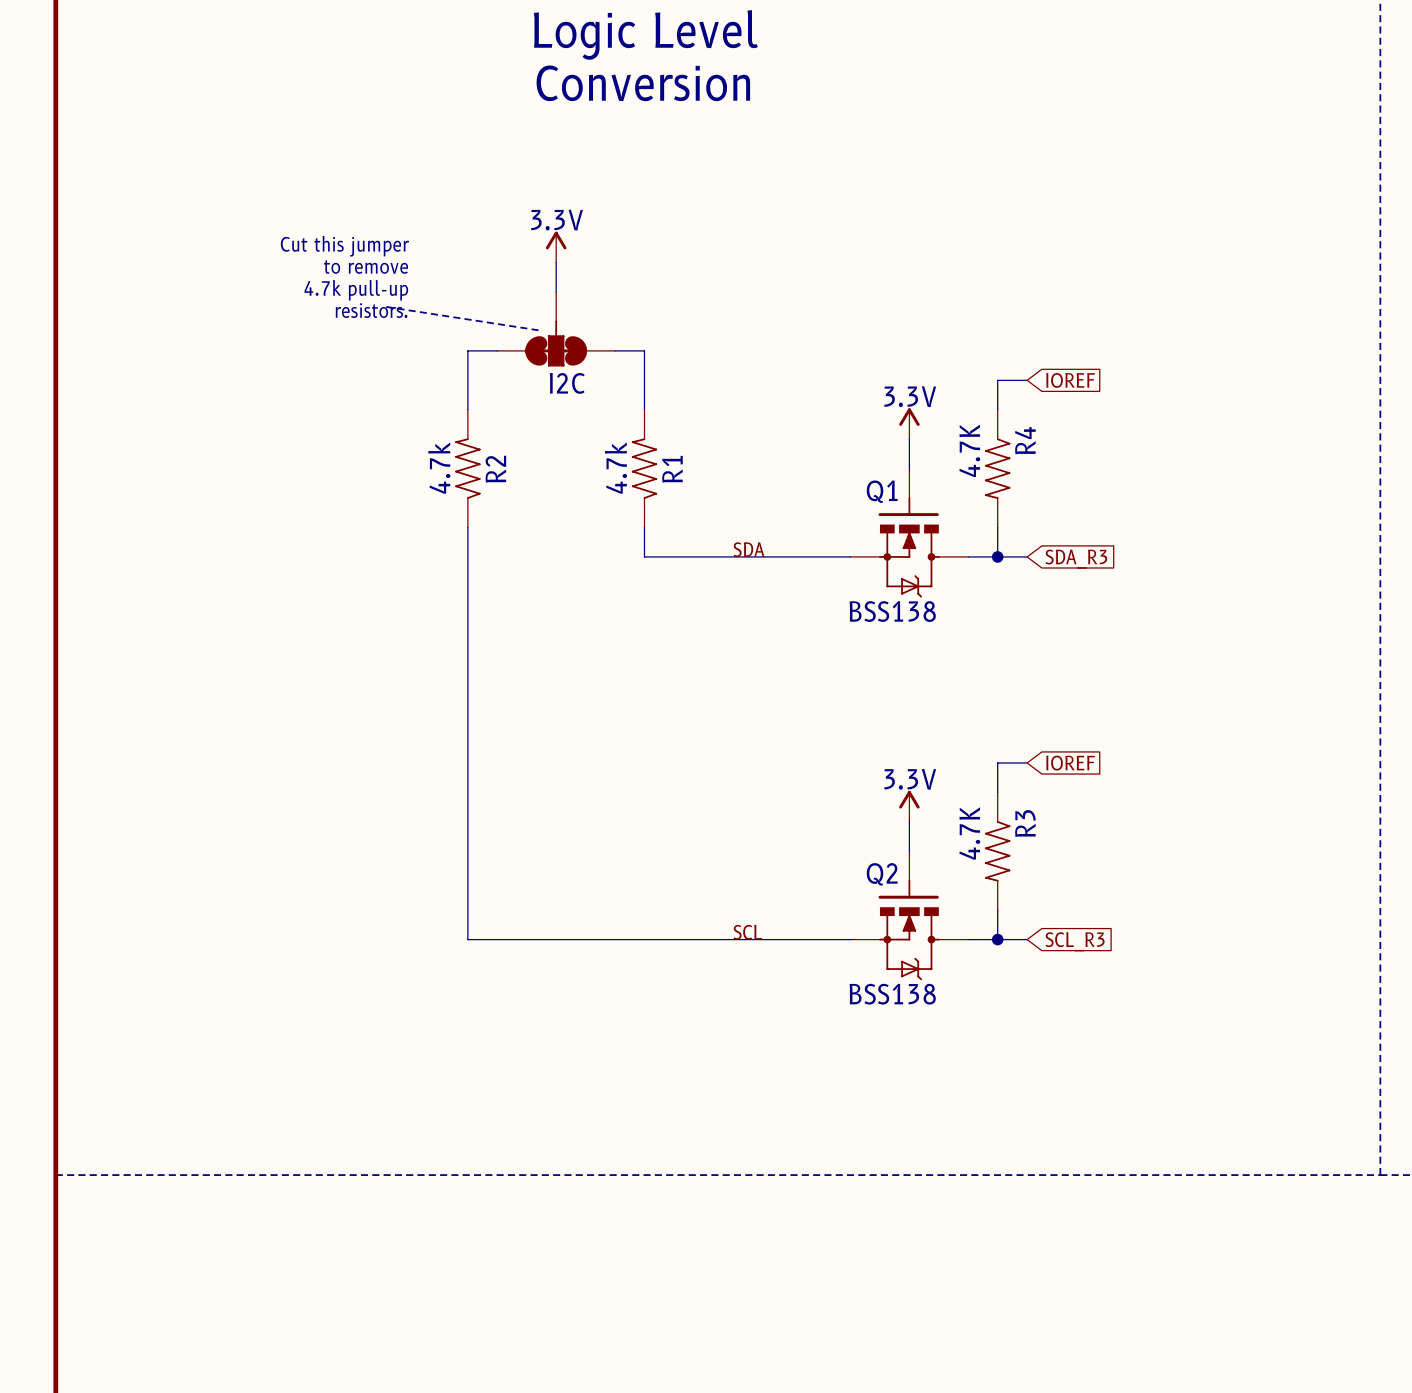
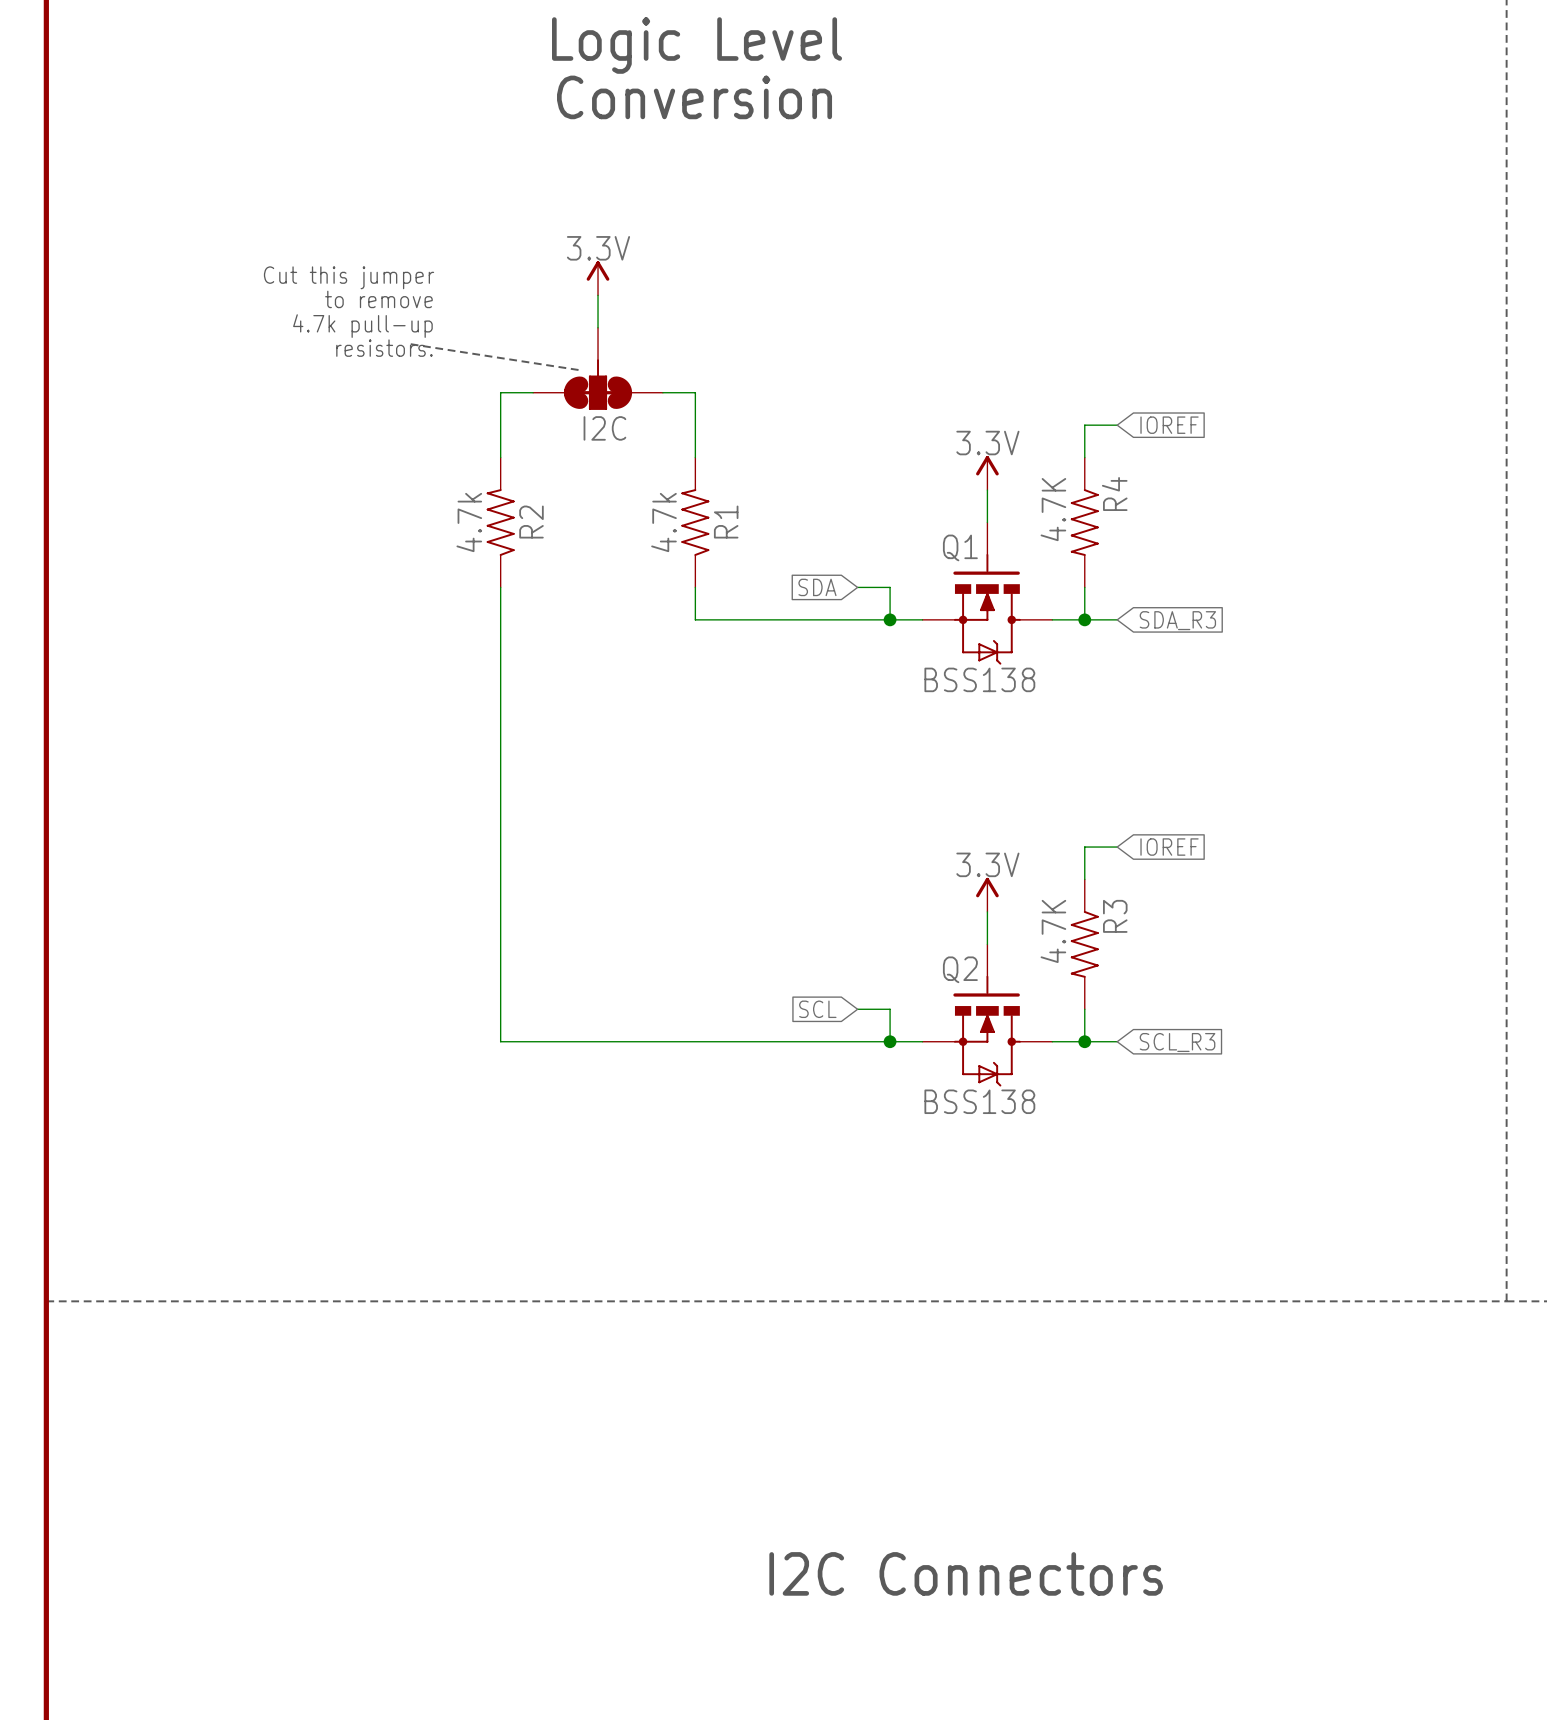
global label: none -> SDA (817, 587)
wire: none -> (857, 587) (890, 587) (890, 619)
label: SDA (748, 549) -> none
junction: none -> (890, 619)
global label: none -> SCL (817, 1009)
wire: none -> (857, 1009) (890, 1009) (890, 1041)
label: SCL (747, 932) -> none
junction: none -> (890, 1041)

